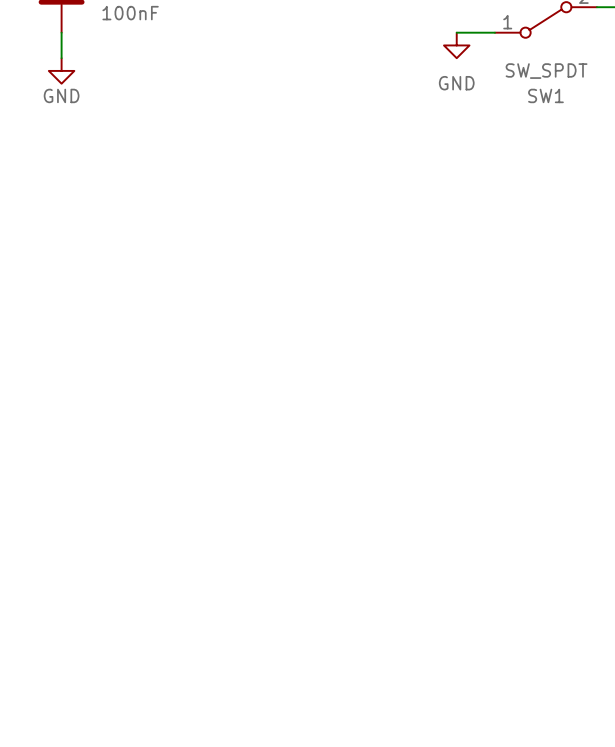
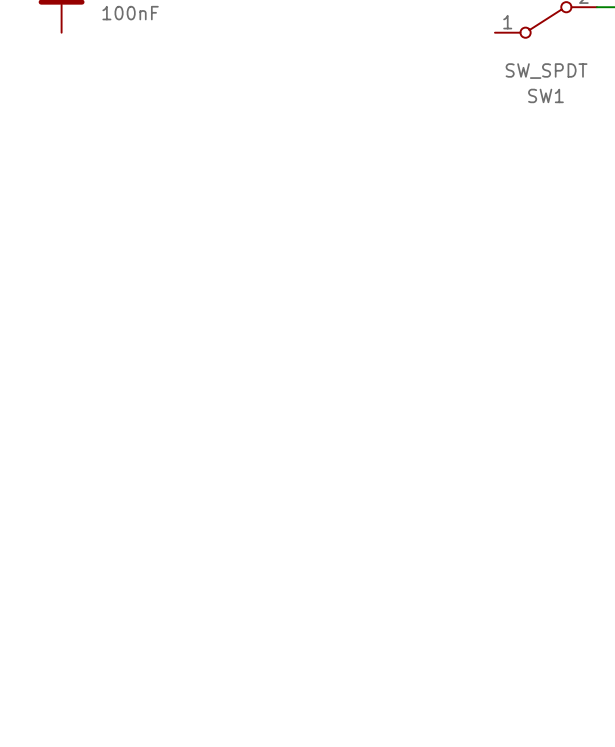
wire: (61, 32) (61, 58) -> none
wire: (456, 32) (494, 32) -> none
power symbol: GND (456, 45) -> none
power symbol: GND (61, 70) -> none

